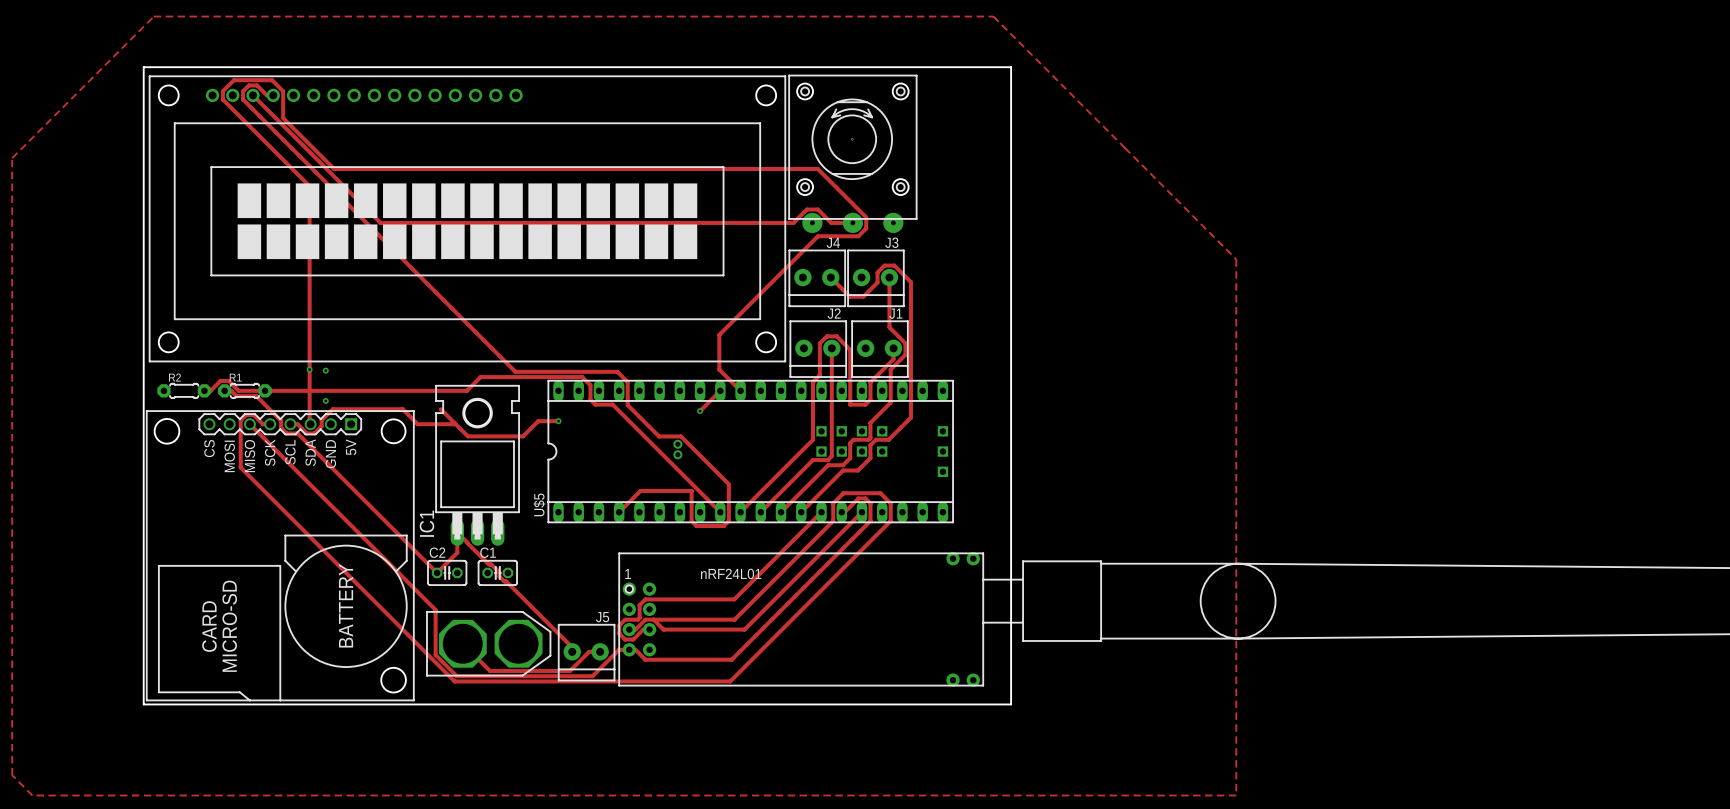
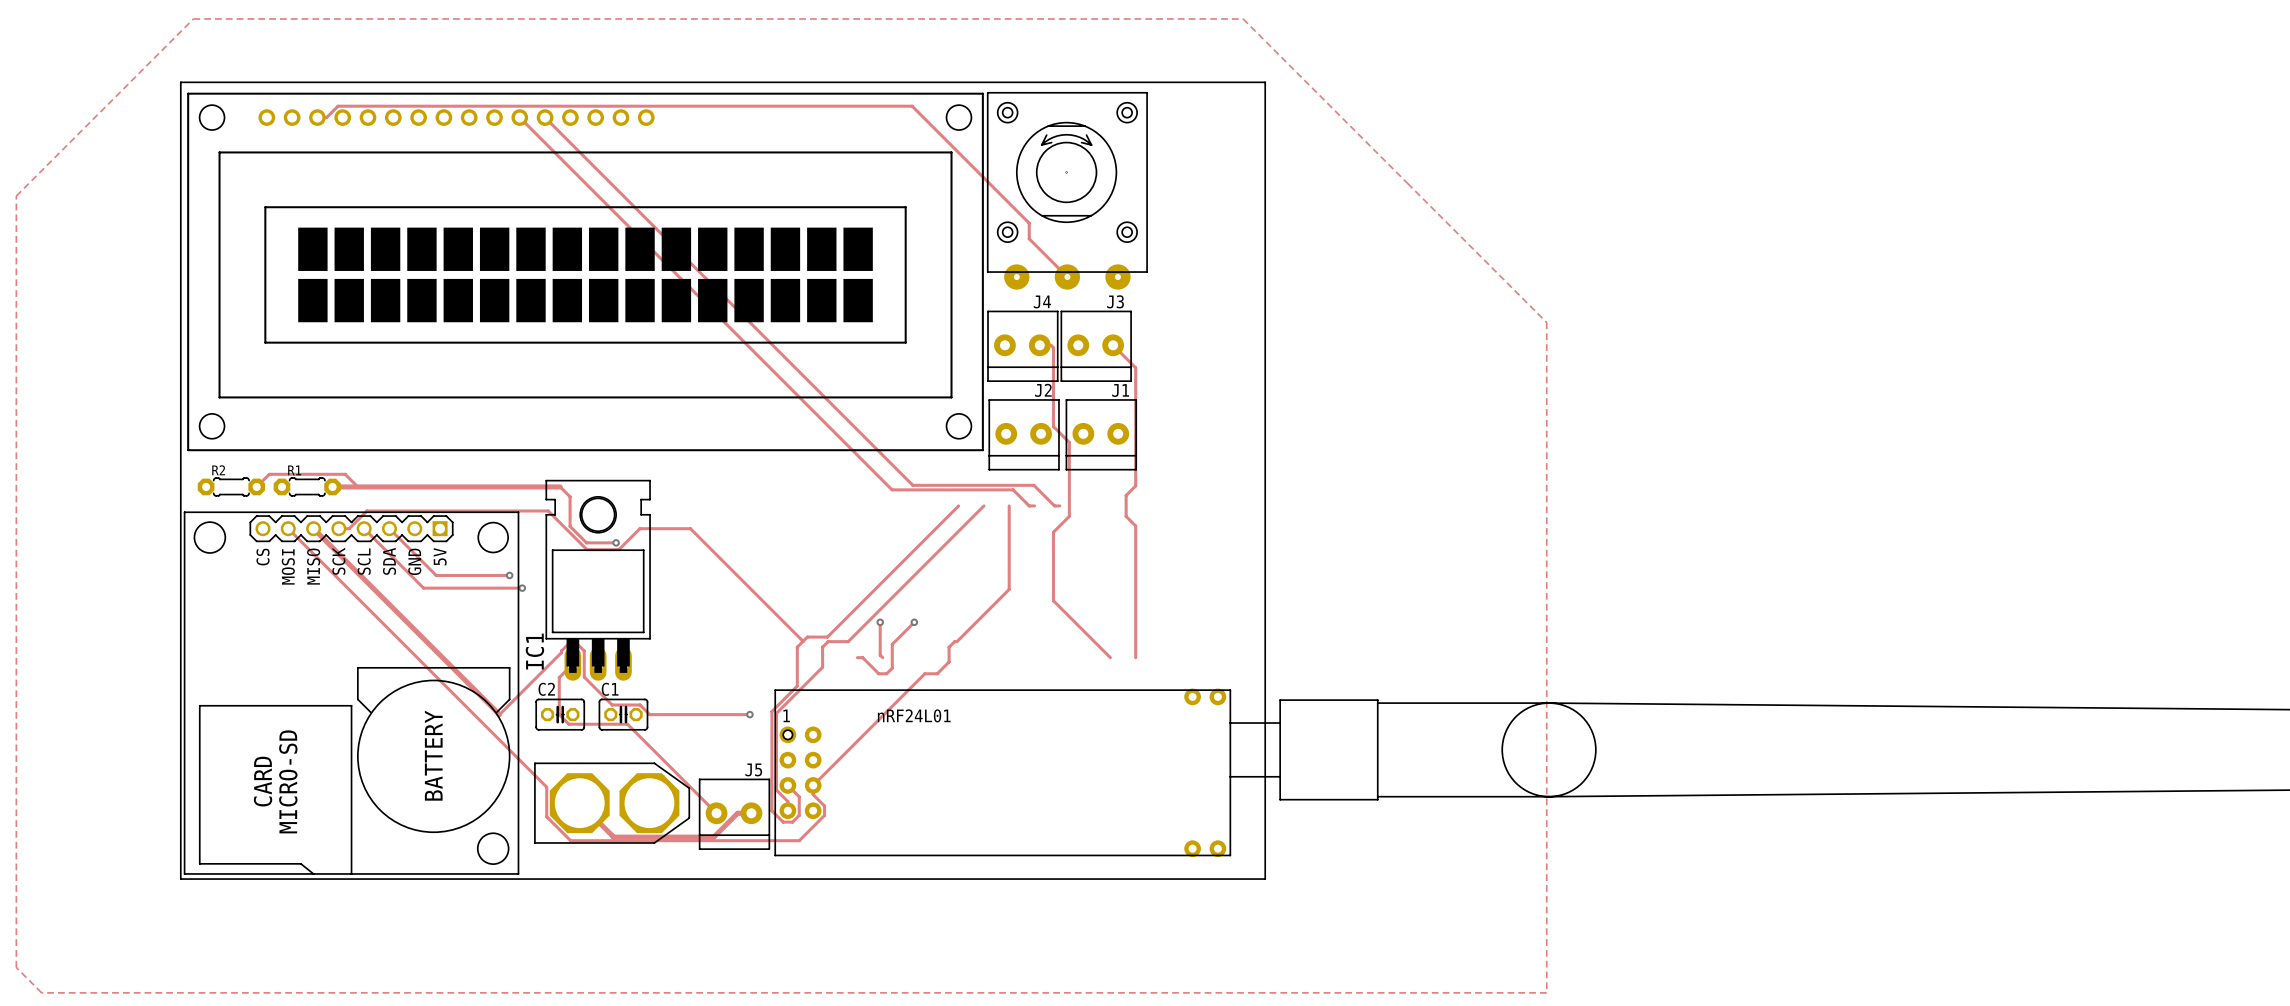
track: (253, 95) (380, 222) (793, 222) (806, 209) (817, 209) (831, 222) (852, 222) -> (317, 117) (326, 117) (338, 106) (912, 106) (1029, 223) (1029, 238) (1067, 277)
track: (273, 95) (267, 95) (257, 85) (248, 85) (243, 91) (243, 99) (515, 371) (617, 371) (627, 382) (627, 405) (659, 436) (681, 436) (728, 484) (728, 521) (723, 526) (696, 526) (691, 521) (691, 490) (640, 490) (619, 512) -> none
track: none -> (519, 117) (892, 489) (1013, 489) (1029, 505) (1034, 505)
track: none -> (545, 117) (912, 485) (1033, 485) (1054, 505) (1059, 505)
track: (830, 277) (849, 296) (863, 296) (877, 282) (877, 272) (884, 265) (894, 265) (910, 282) (910, 417) (888, 439) (875, 439) (870, 445) (870, 458) (858, 470) (843, 470) (801, 512) -> (1039, 345) (1050, 345) (1053, 347) (1053, 426) (1069, 442) (1069, 516) (1053, 532) (1053, 600) (1110, 657)
track: (889, 277) (889, 327) (905, 343) (905, 354) (890, 369) (890, 402) (870, 422) (870, 437) (868, 439) (853, 439) (850, 443) (850, 458) (843, 465) (828, 465) (781, 512) -> (1113, 345) (1135, 367) (1135, 485) (1126, 495) (1126, 516) (1135, 525) (1135, 657)
track: (831, 348) (831, 456) (828, 459) (813, 459) (760, 512) -> none
track: (893, 348) (893, 359) (870, 382) (870, 399) (865, 404) (850, 404) (850, 349) (836, 336) (826, 336) (819, 343) (819, 375) (813, 382) (813, 439) (740, 512) -> none
via: (309, 369) -> none
via: (325, 370) -> none
track: (204, 390) (210, 390) (220, 380) (228, 380) (238, 390) (265, 390) -> (256, 486) (269, 474) (345, 474) (357, 486)
track: (224, 390) (231, 390) (236, 396) (256, 396) (281, 420) (281, 428) (286, 433) (297, 433) (437, 572) (457, 552) (457, 532) (572, 647) (572, 651) -> (572, 664) (559, 677) (559, 714) (568, 724) (627, 724) (716, 813)
track: (447, 390) (466, 390) (480, 377) (582, 377) (590, 385) (590, 399) (595, 404) (612, 404) (720, 512) -> (560, 486) (570, 496) (570, 526) (586, 542) (616, 542)
track: (720, 390) (700, 411) -> none
track: (740, 390) (719, 369) (719, 334) (817, 236) (858, 236) (866, 228) (866, 217) (817, 168) (334, 168) (283, 118) (283, 91) (272, 80) (233, 80) (222, 91) (222, 99) (309, 186) (310, 424) -> (509, 575) (436, 575) (389, 528)
via: (325, 400) -> none
track: none -> (958, 505) (827, 637) (807, 637) (797, 647) (797, 686) (771, 711) (771, 810) (783, 822) (792, 822) (799, 815) (799, 796) (787, 785)
track: none -> (983, 505) (848, 641) (828, 641) (822, 647) (822, 667) (776, 713) (776, 790) (787, 801) (787, 810)
track: none -> (1009, 505) (1009, 589) (949, 647) (949, 661) (937, 673) (924, 673) (813, 785) (813, 794) (824, 806) (824, 815) (799, 840) (570, 840) (546, 816) (546, 787) (288, 528)
track: (440, 409) (467, 436) (523, 436) (538, 421) (558, 421) -> none
via: (700, 411) -> none
via: (558, 421) -> none
track: (455, 423) (417, 424) (402, 409) (332, 409) (321, 420) (321, 426) (314, 433) (306, 433) (297, 424) (290, 424) -> (522, 588) (423, 588) (364, 528)
track: (270, 424) (263, 424) (253, 414) (246, 414) (240, 420) (240, 467) (454, 681) (730, 681) (890, 521) (890, 503) (880, 493) (843, 493) (833, 503) (833, 521) (734, 619) (645, 619) (635, 629) (629, 629) -> (338, 528) (349, 528) (366, 510) (548, 510) (586, 549) (618, 549) (639, 528) (690, 528) (803, 641)
via: none -> (616, 542)
U$5: (750, 451) -> none
via: none -> (509, 575)
via: none -> (522, 588)
track: none -> (880, 622) (880, 655) (882, 657)
via: none -> (880, 622)
track: none -> (914, 622) (892, 644) (892, 668) (886, 673) (878, 673) (862, 657) (857, 657)
via: none -> (914, 622)
track: (821, 512) (734, 599) (645, 599) (639, 605) (639, 618) (625, 619) (619, 625) (619, 633) (625, 639) (633, 639) (643, 629) (649, 629) -> none
track: (841, 512) (844, 512) (858, 498) (865, 498) (870, 503) (870, 521) (731, 659) (645, 659) (635, 649) (619, 649) (592, 676) (456, 676) (435, 655) (435, 609) (398, 572) -> (749, 714) (649, 714) (640, 705) (612, 705) (584, 677) (584, 650) (577, 644) (568, 644) (499, 714)
track: (861, 512) (744, 629) (663, 629) (653, 619) -> none
via: none -> (749, 714)

